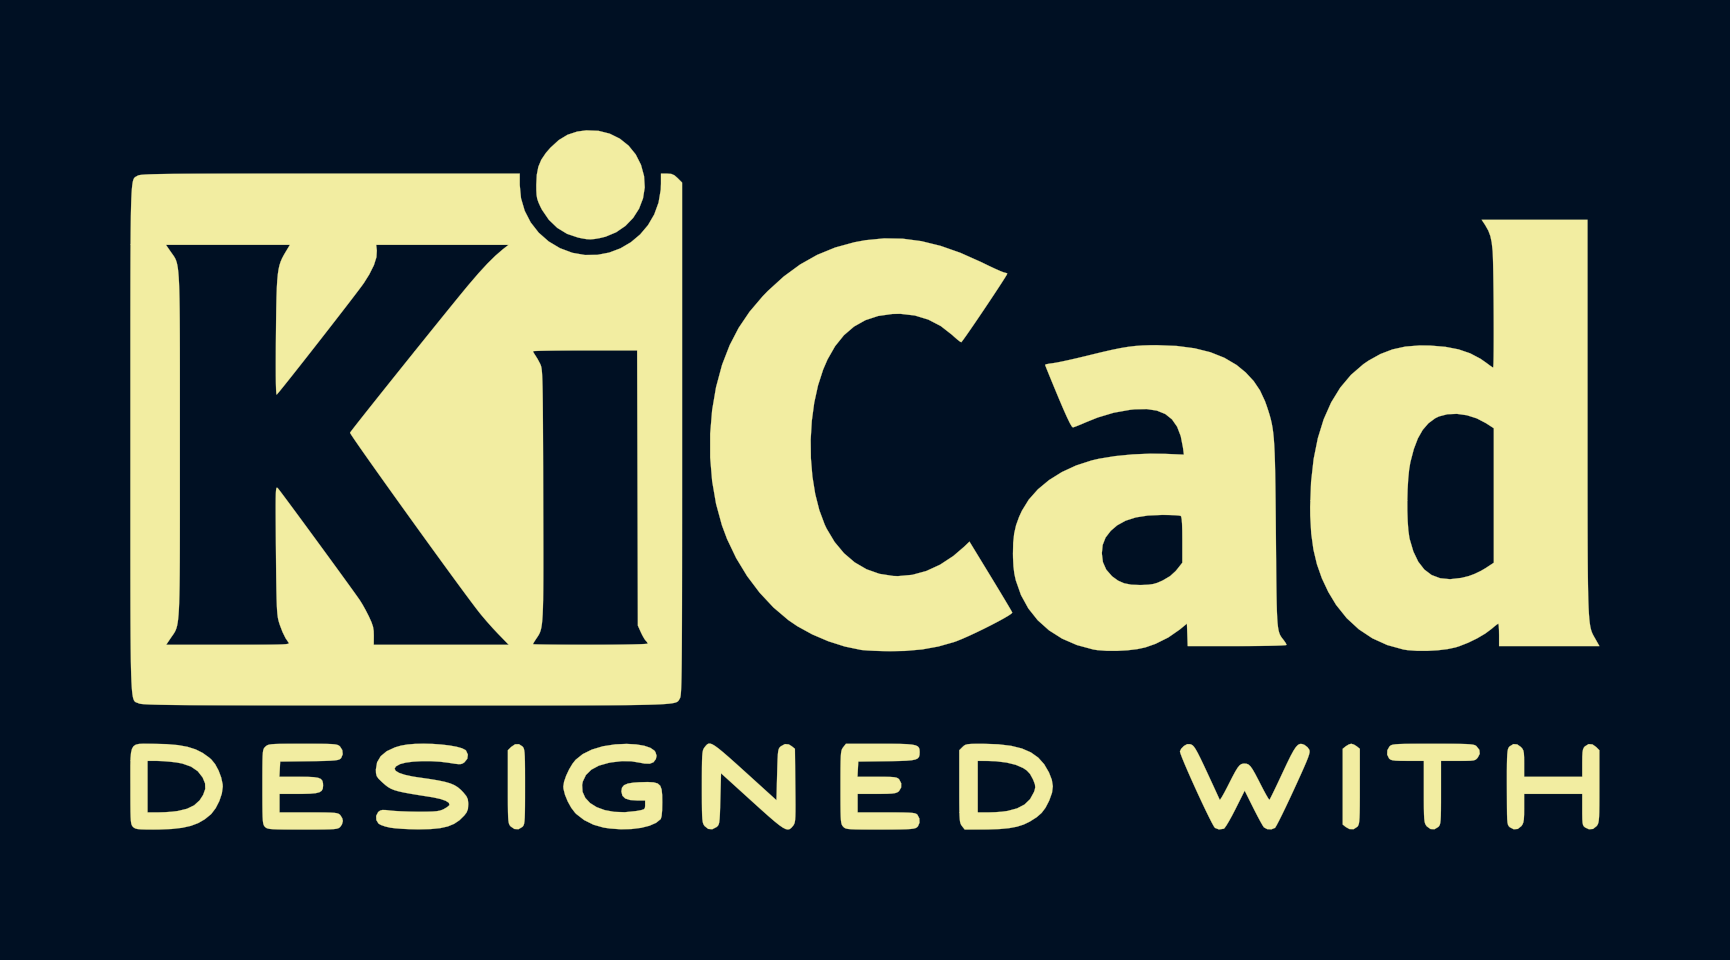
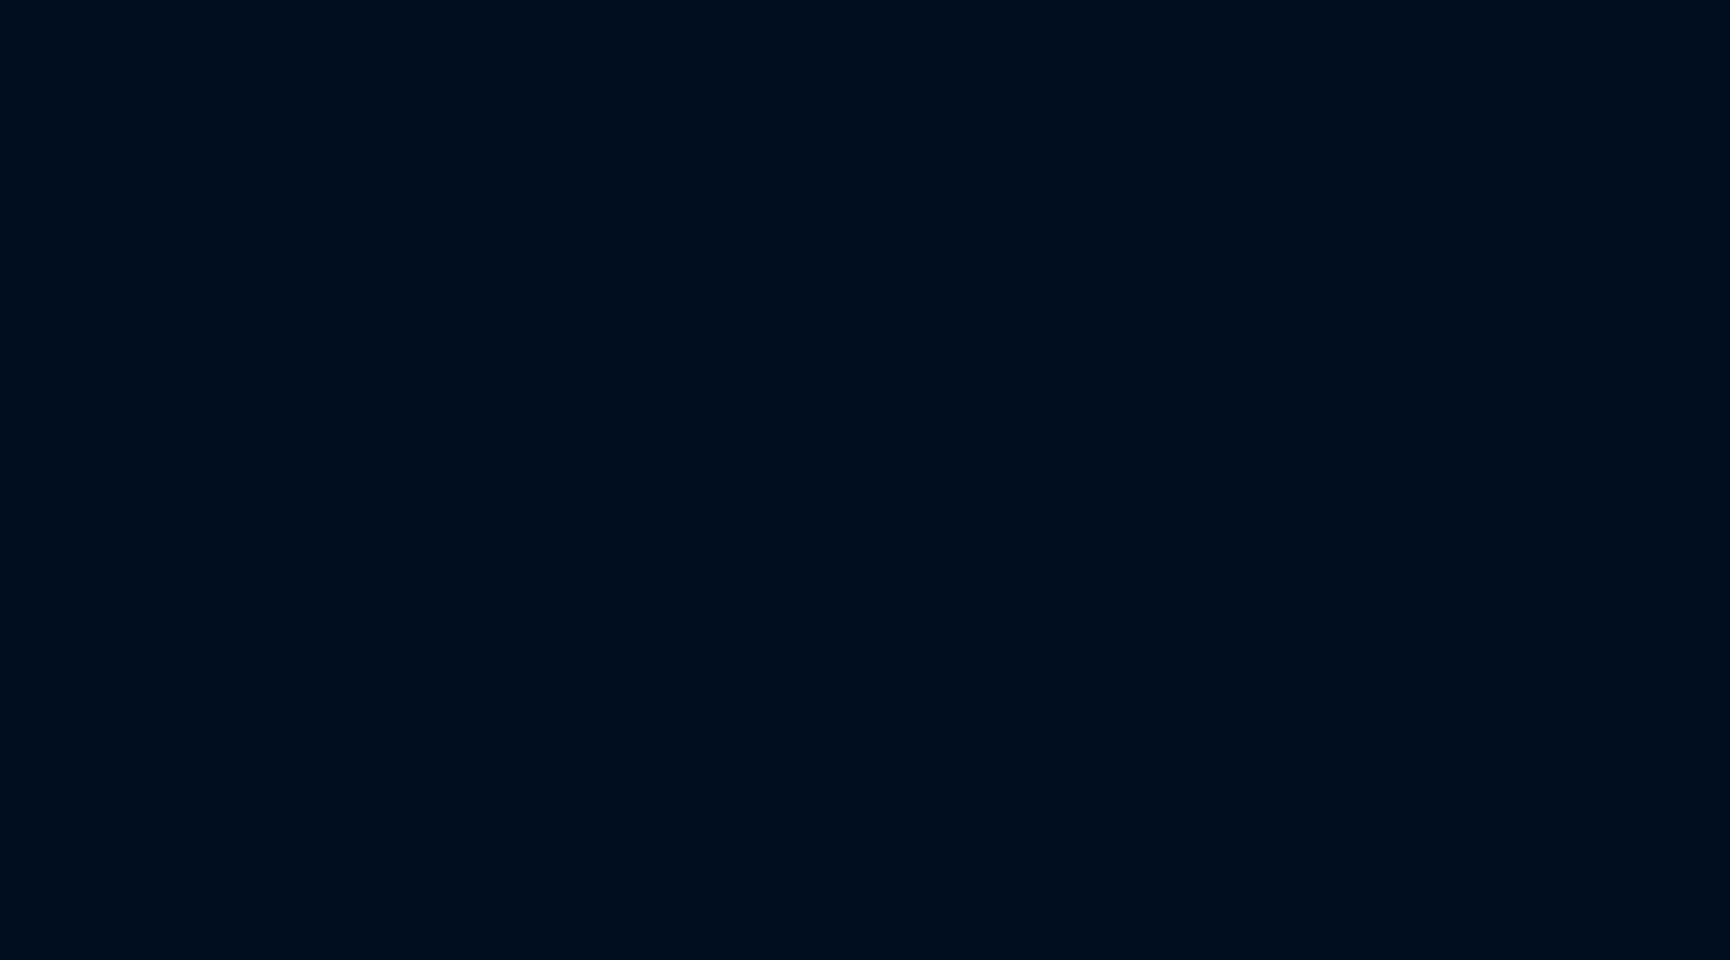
drawing: [130, 130, 1600, 830] -> none

